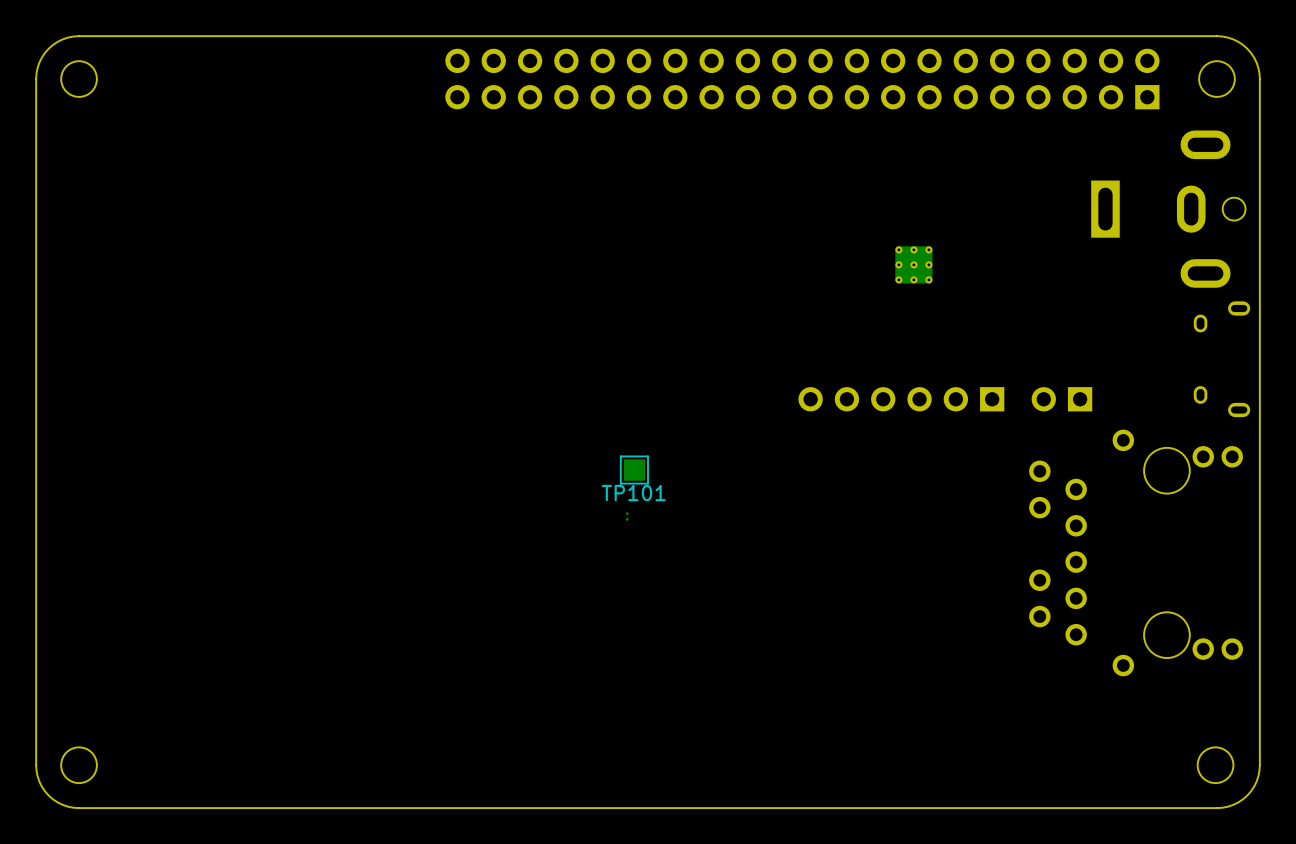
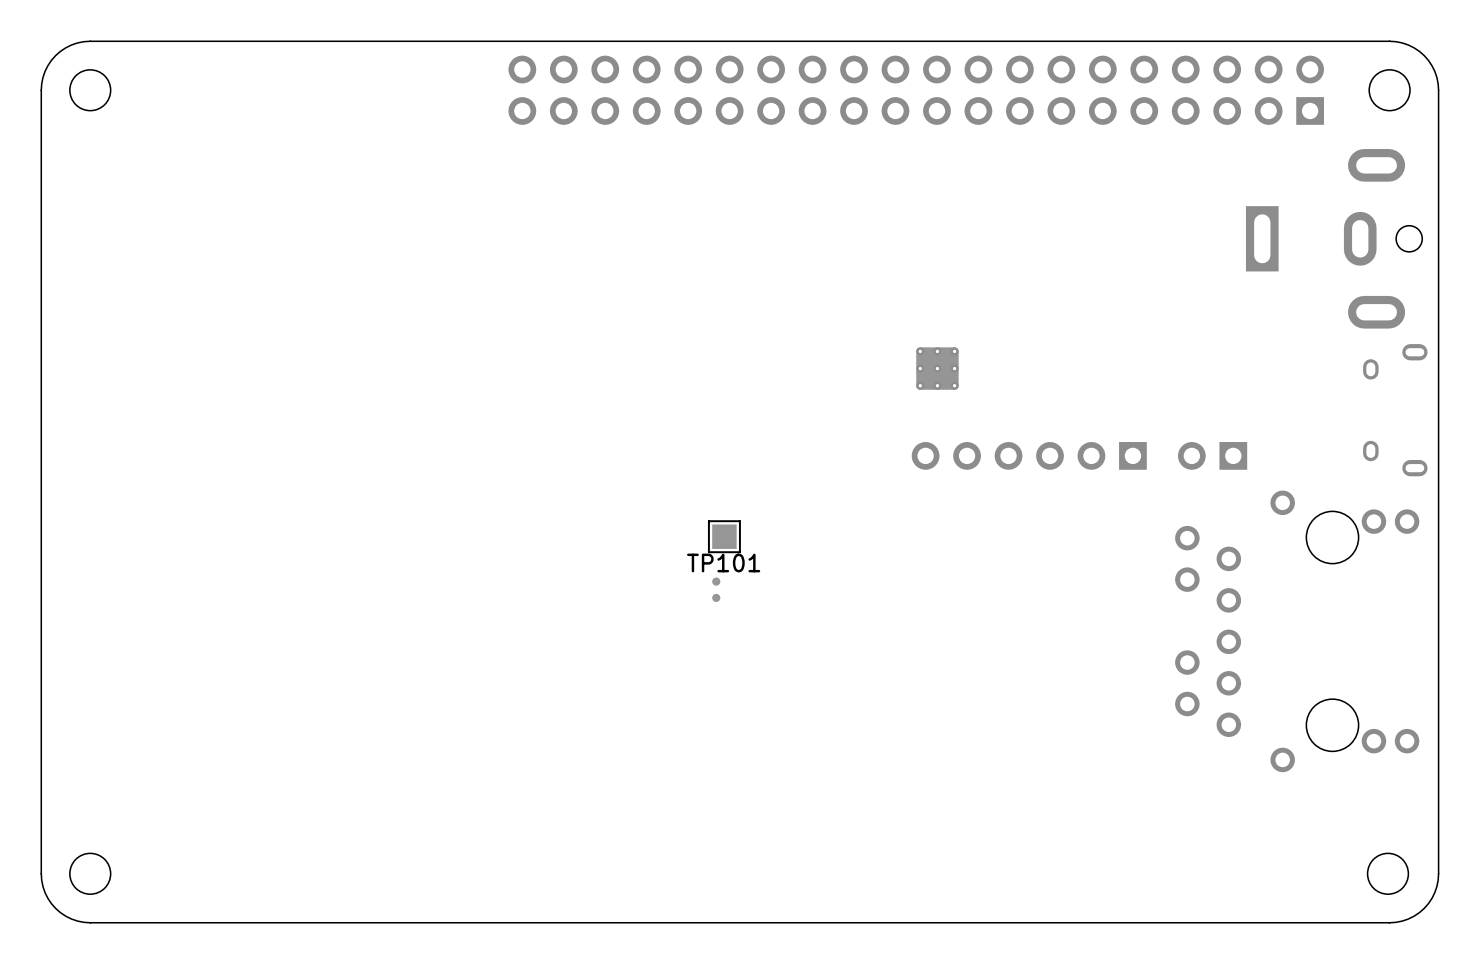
part position: (913, 264) -> (937, 368)
part footprint: [625, 512, 629, 521] -> [712, 577, 721, 603]

